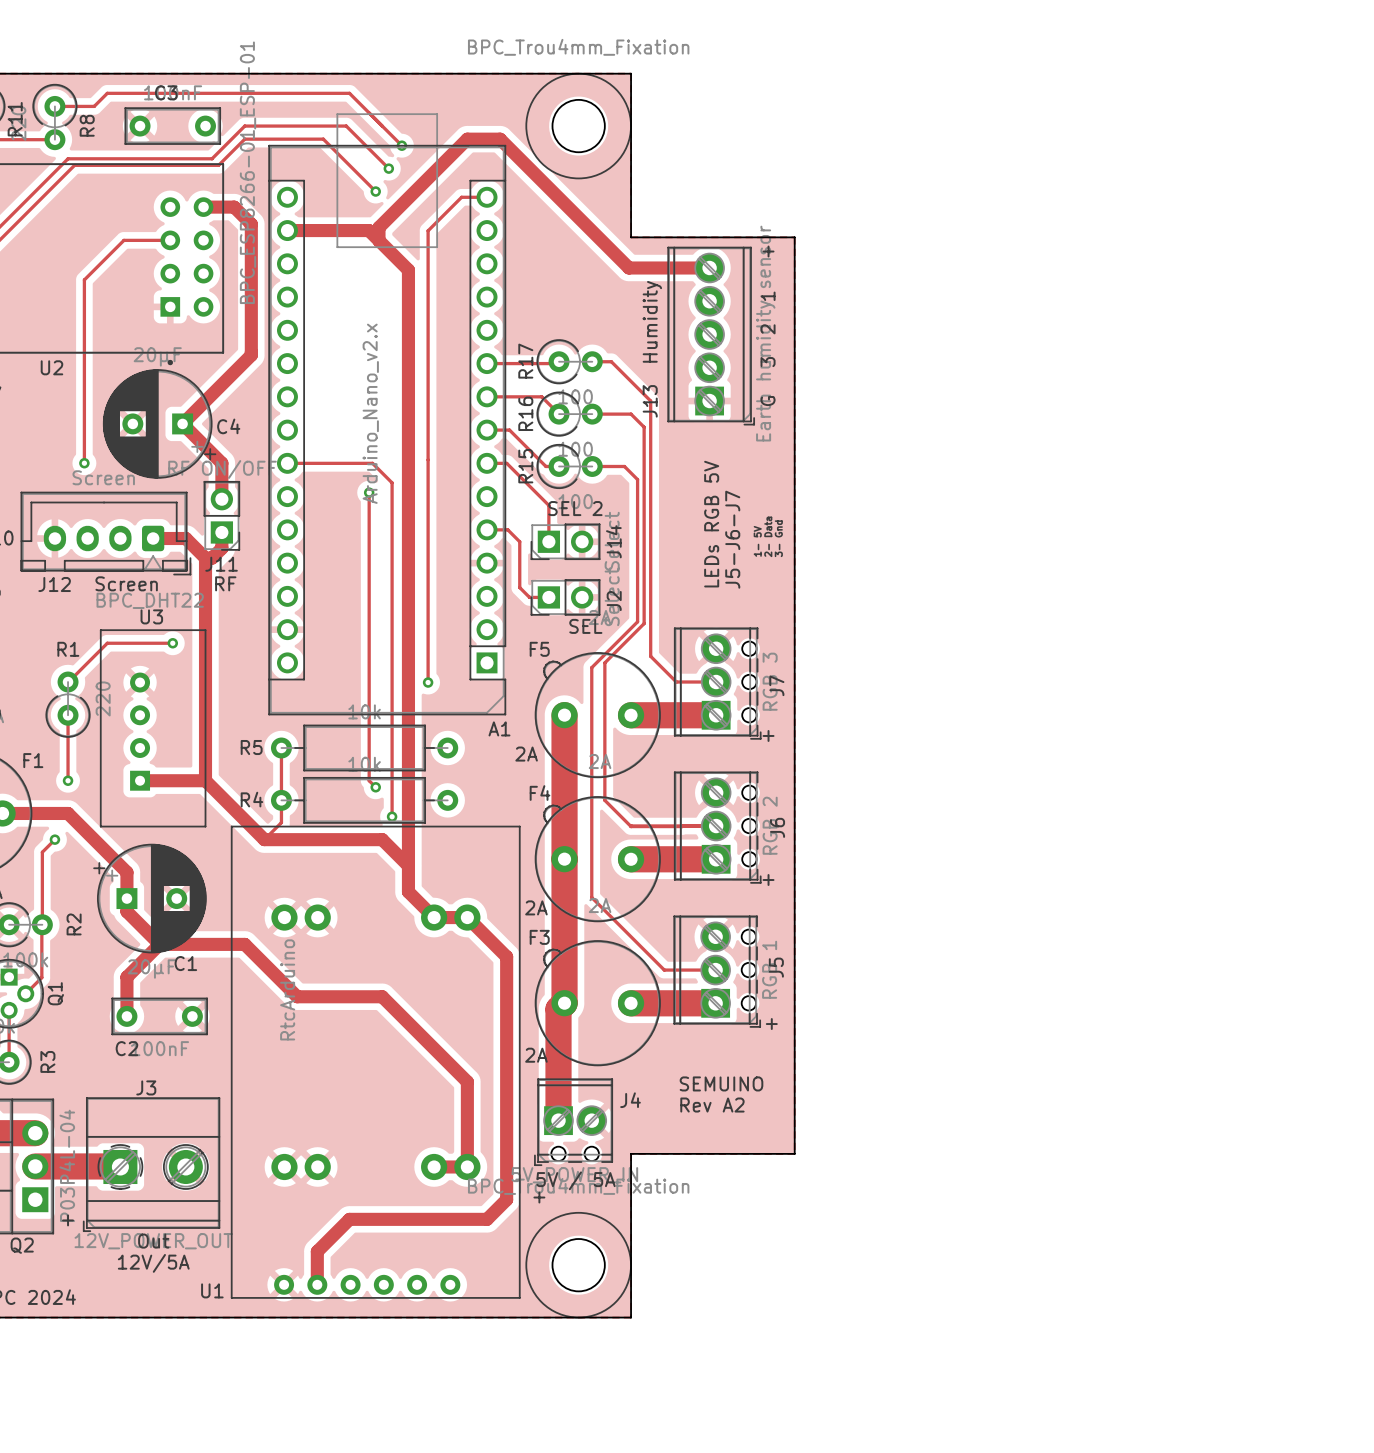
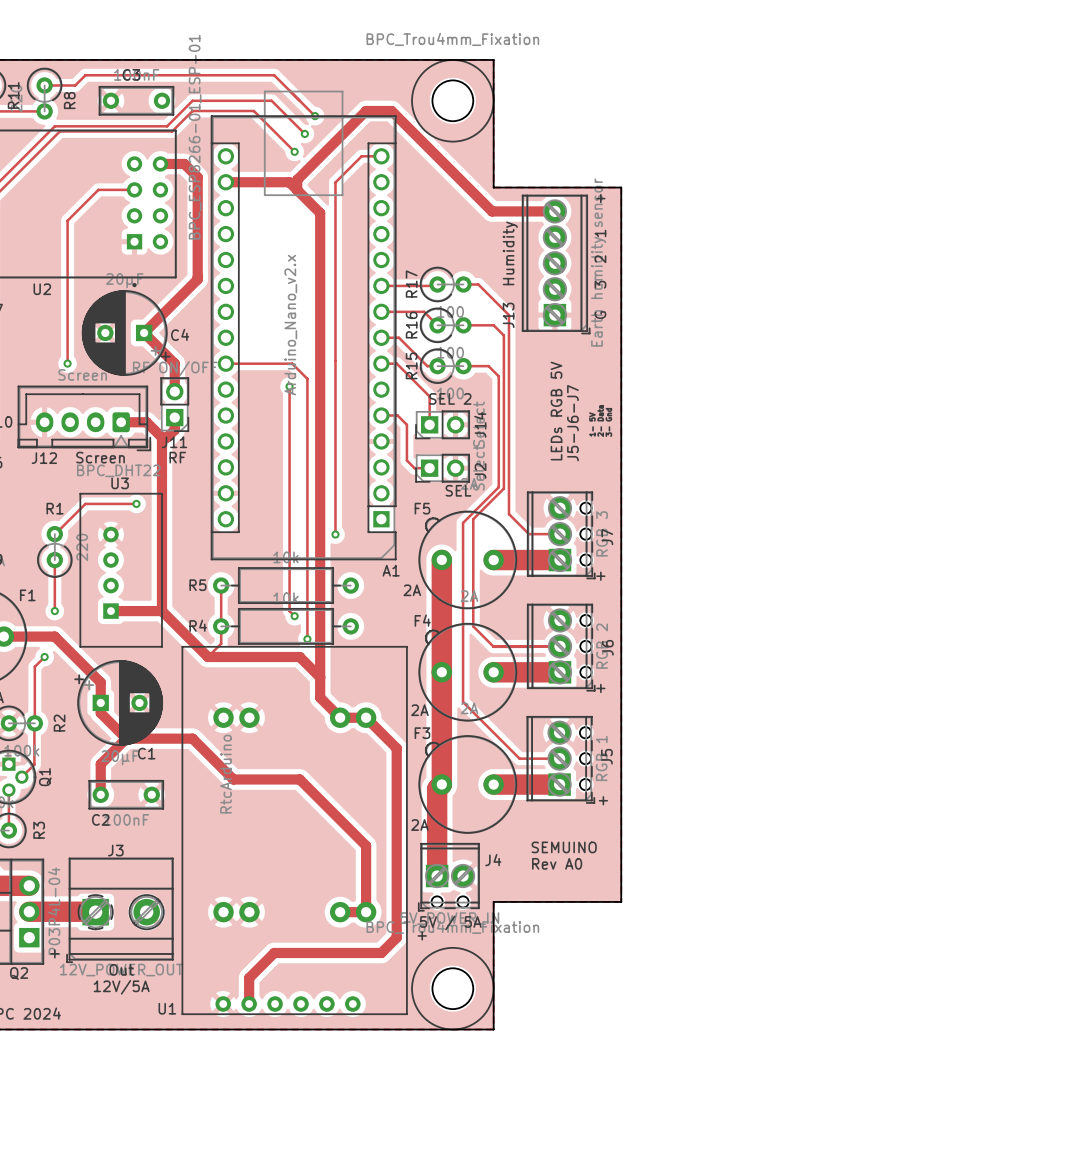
text: Rev A2 (712, 1105) -> Rev A0 (557, 863)

